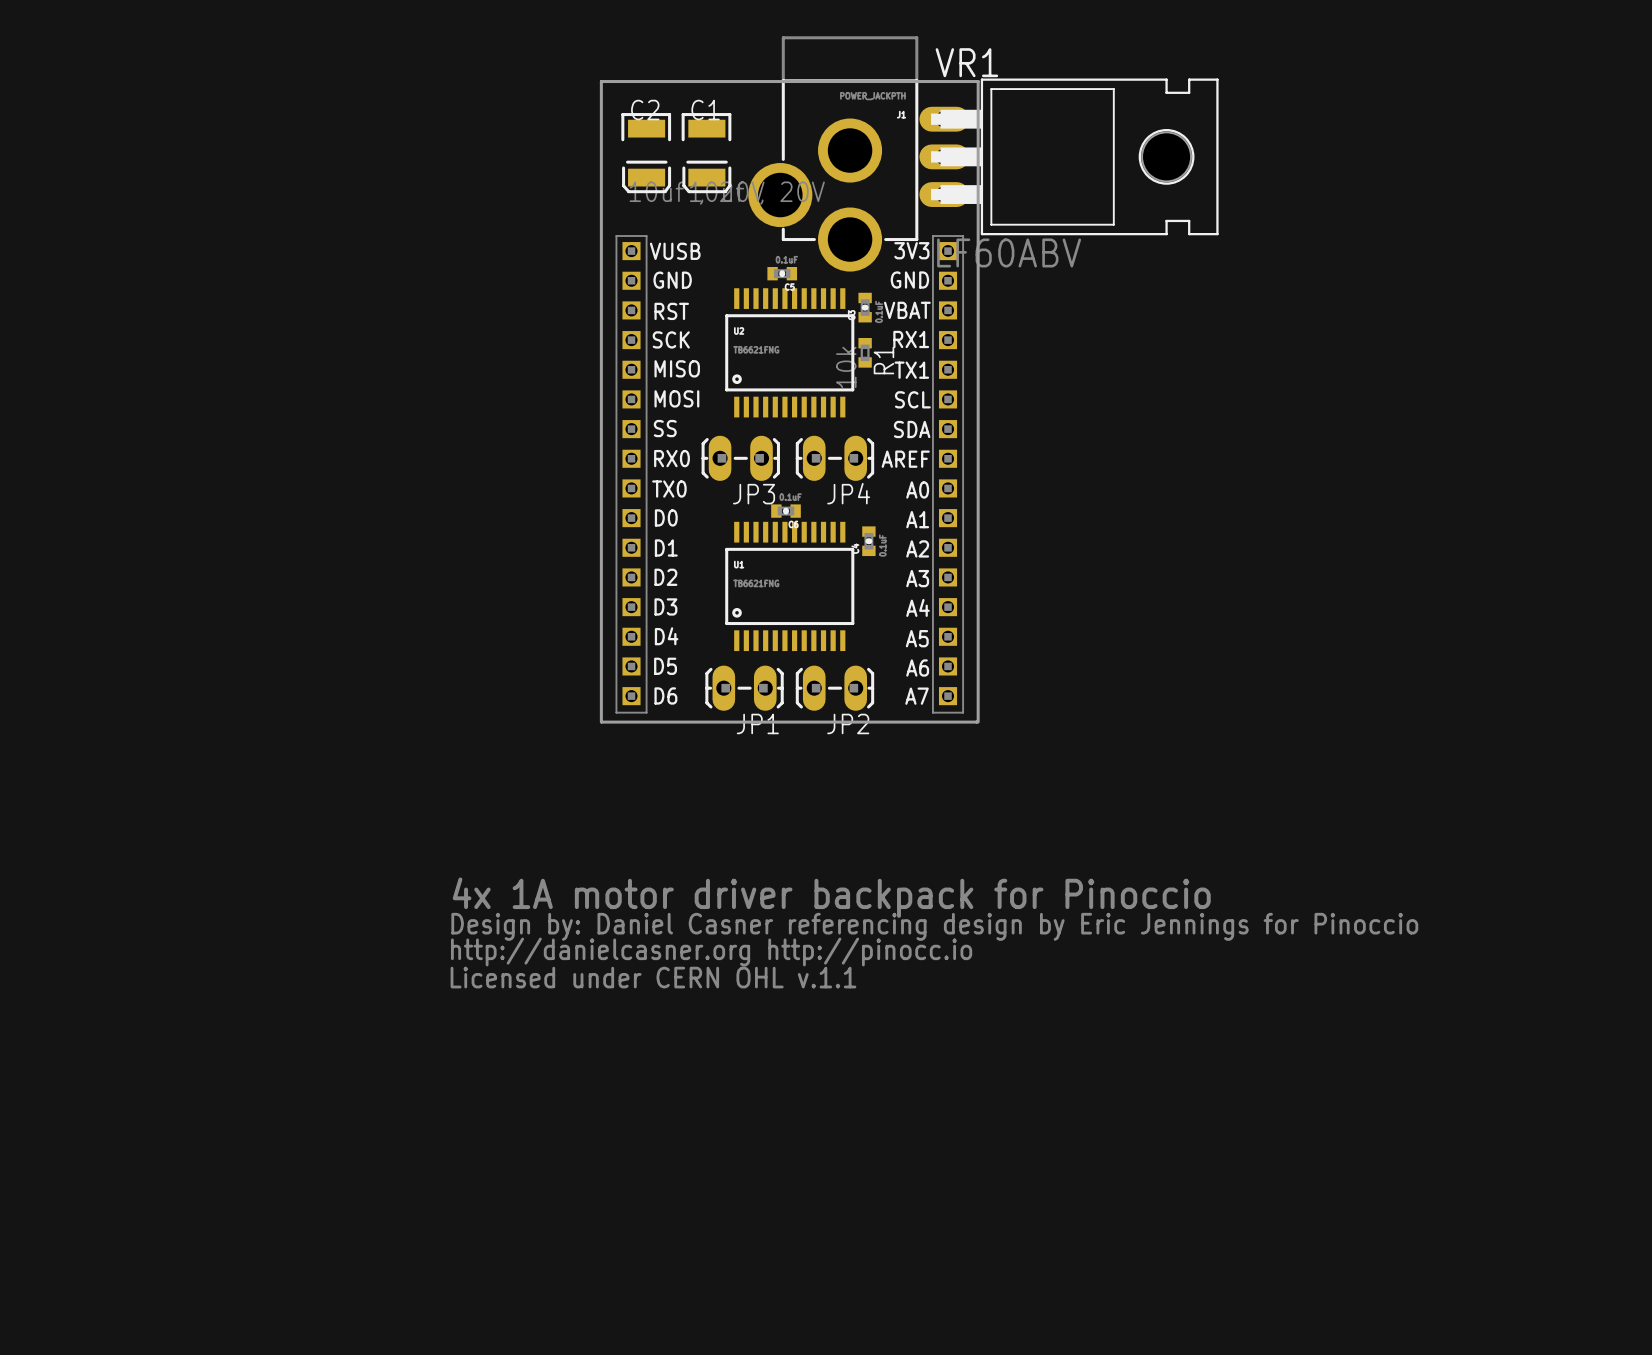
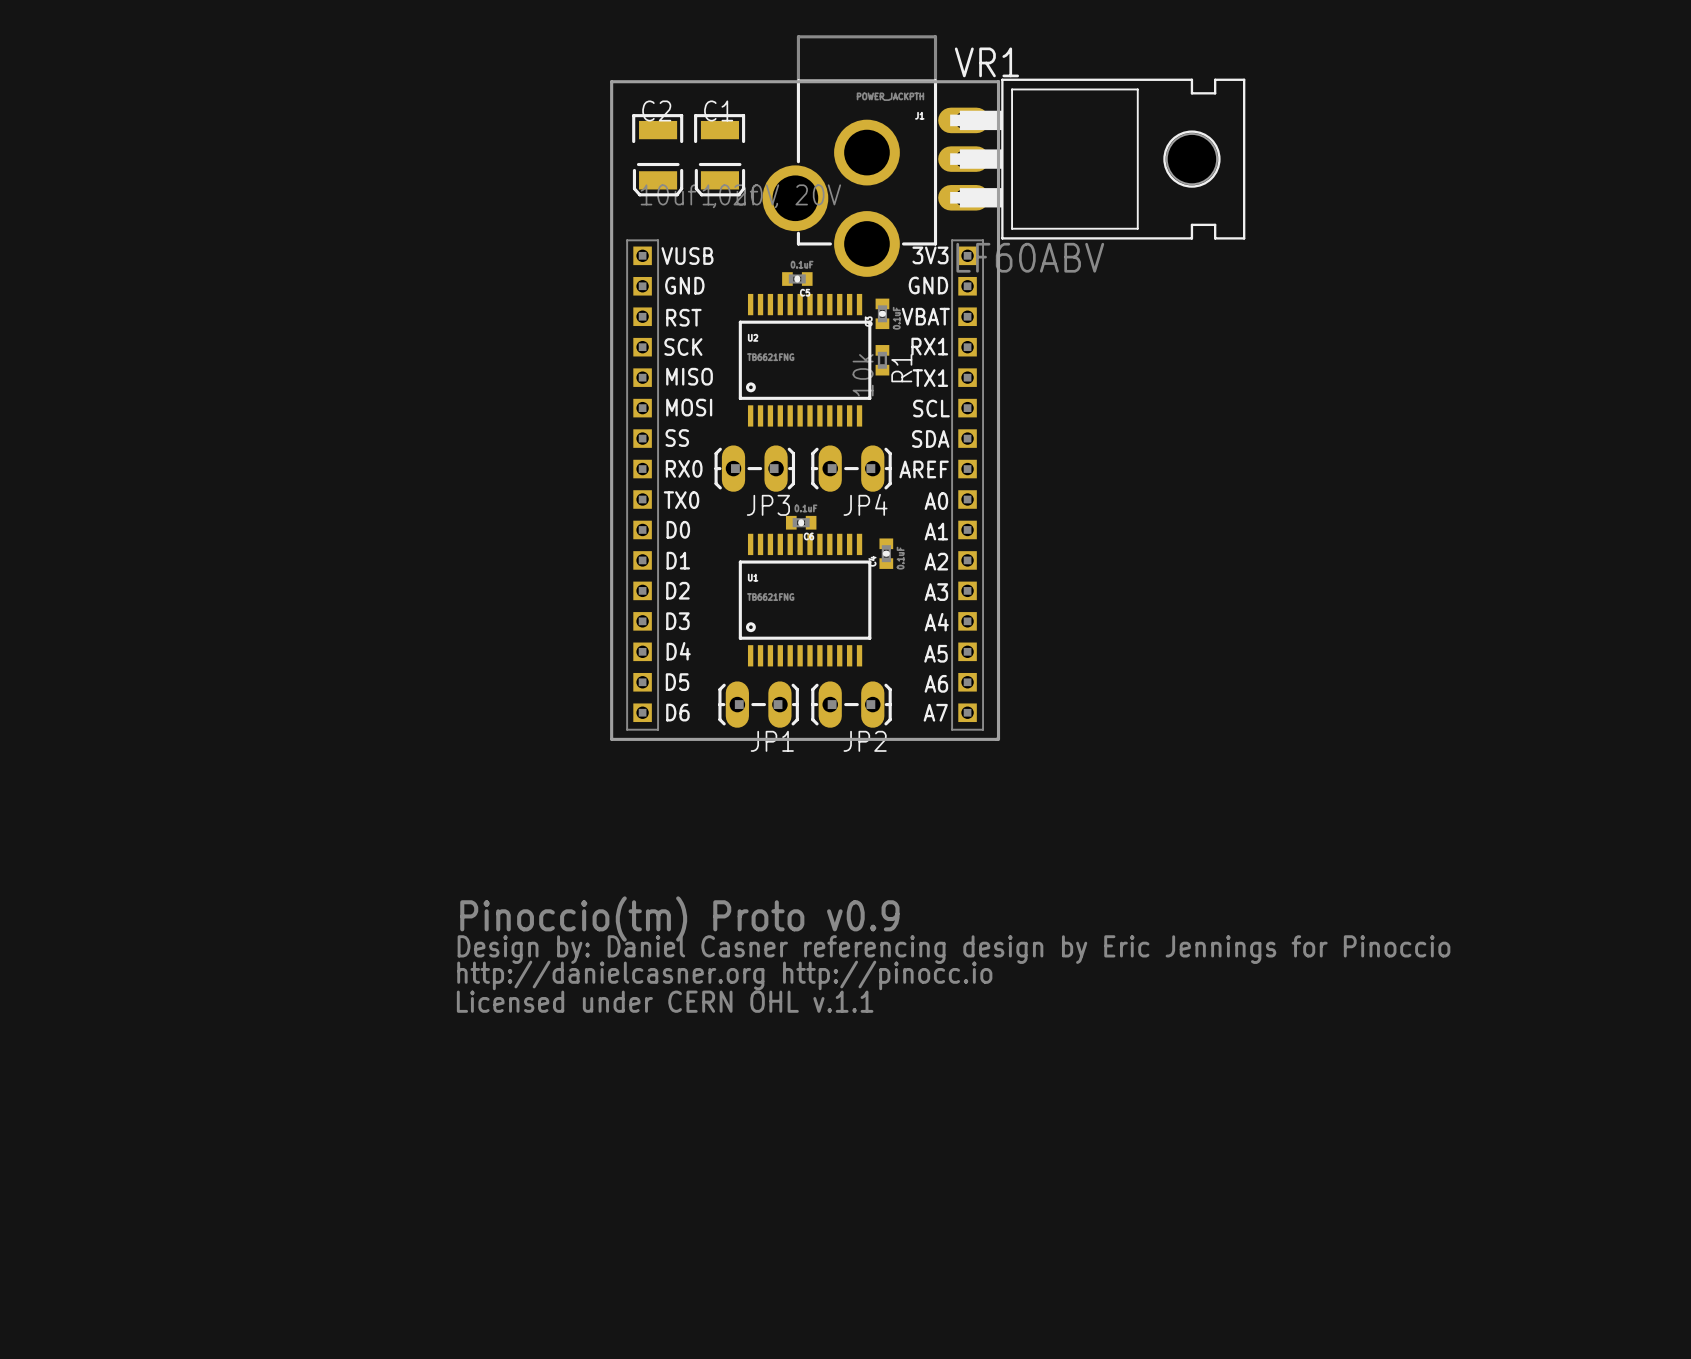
text: 4x 1A motor driver backpack for Pinoccio (831, 897) -> Pinoccio(tm) Proto v0.9 (679, 919)

